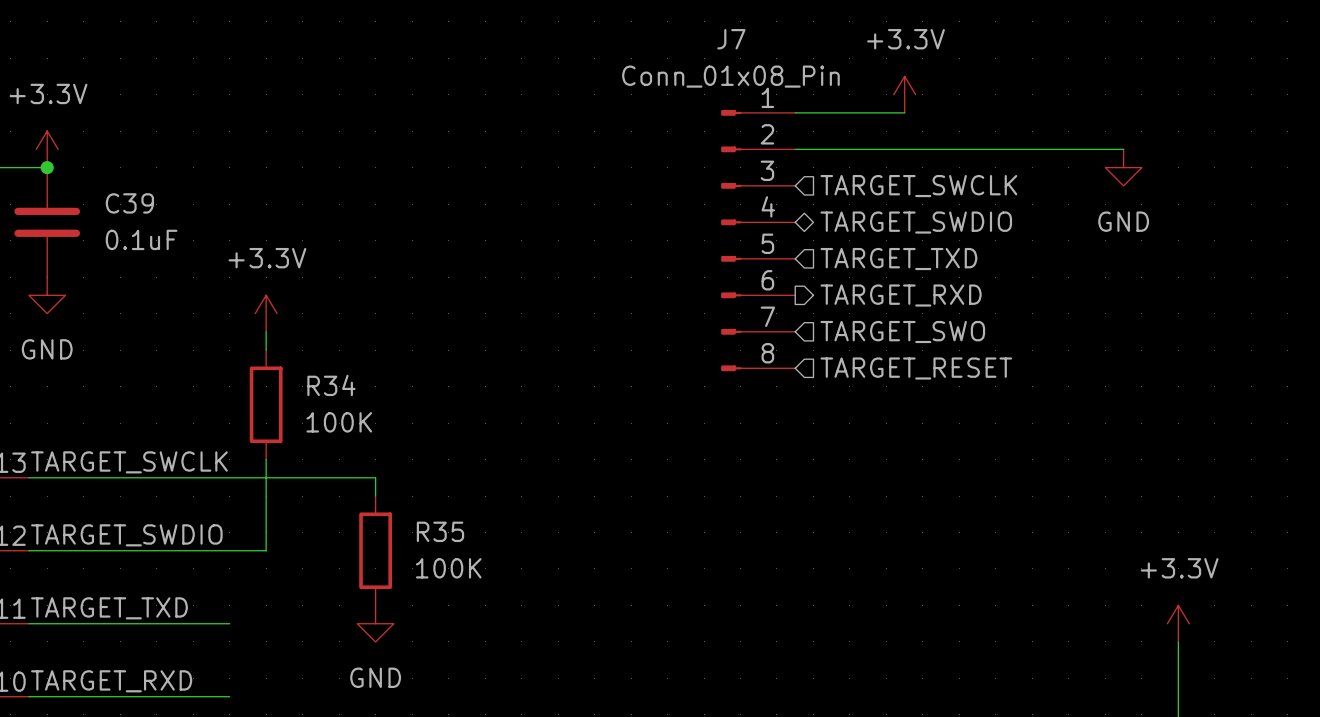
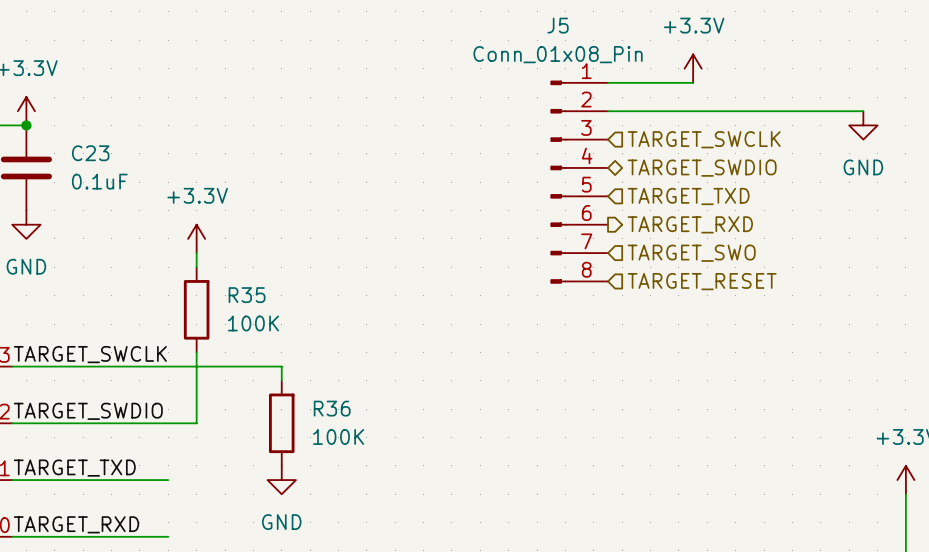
J7 name: J7 (731, 39) -> J5 (558, 25)
C39 name: C39 (129, 203) -> C23 (90, 153)
R34 name: R34 (331, 385) -> R35 (247, 295)
R35 name: R35 (440, 531) -> R36 (332, 408)

